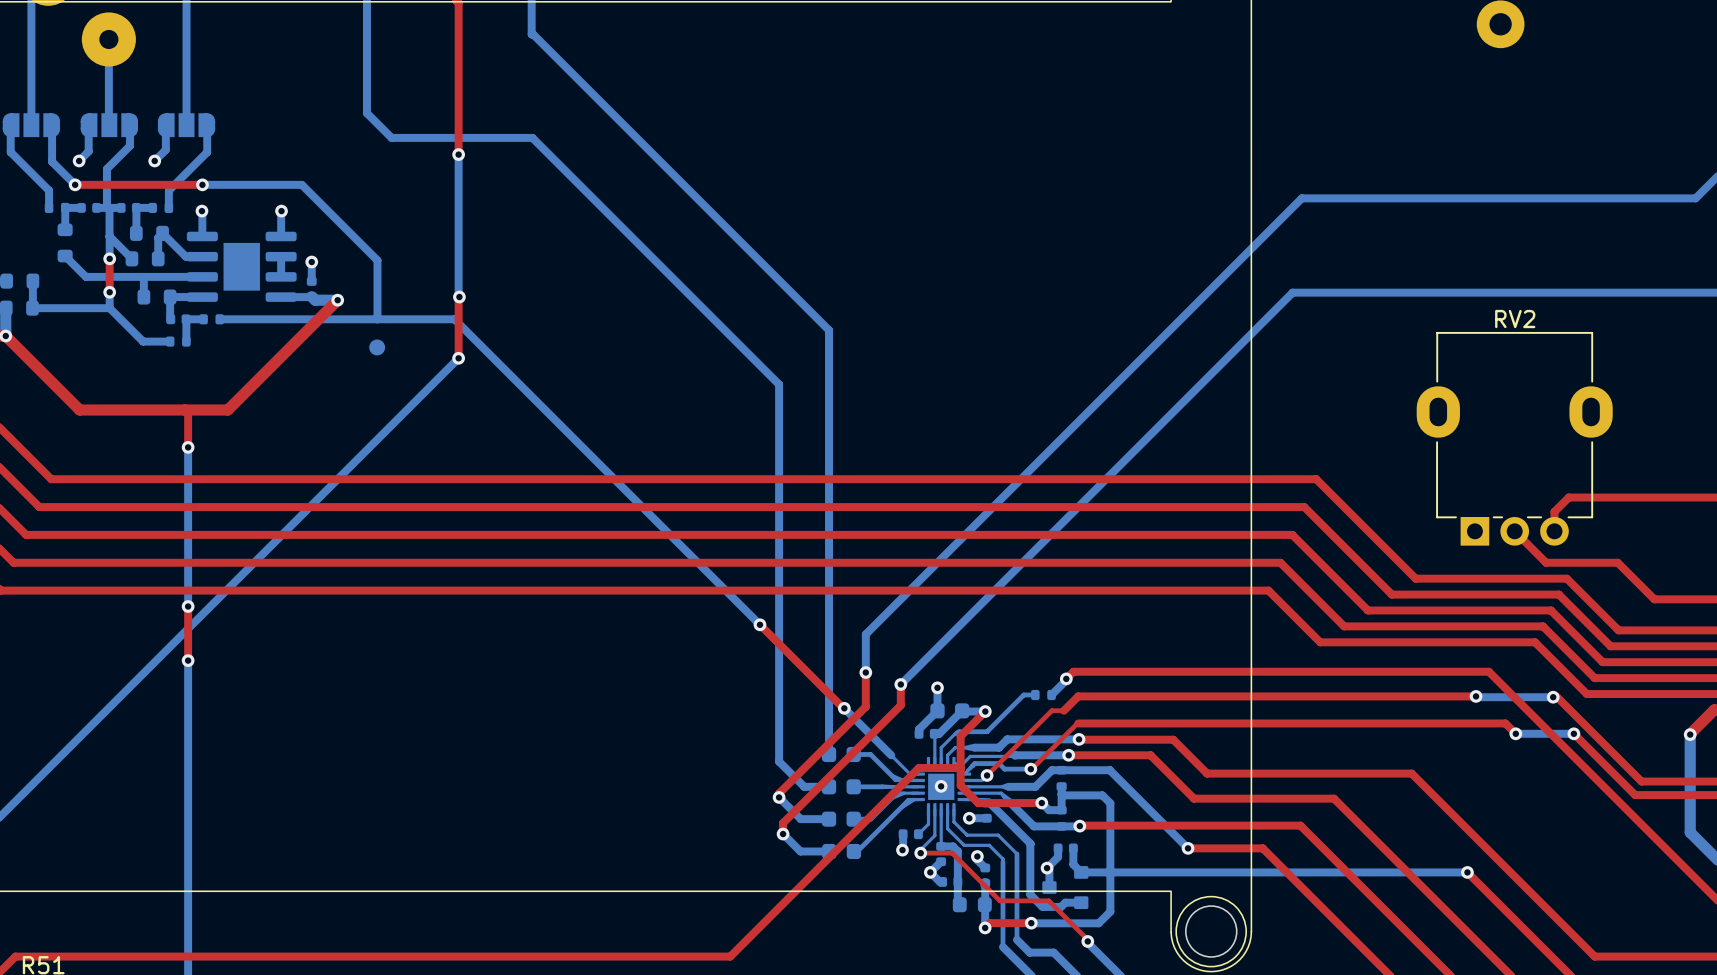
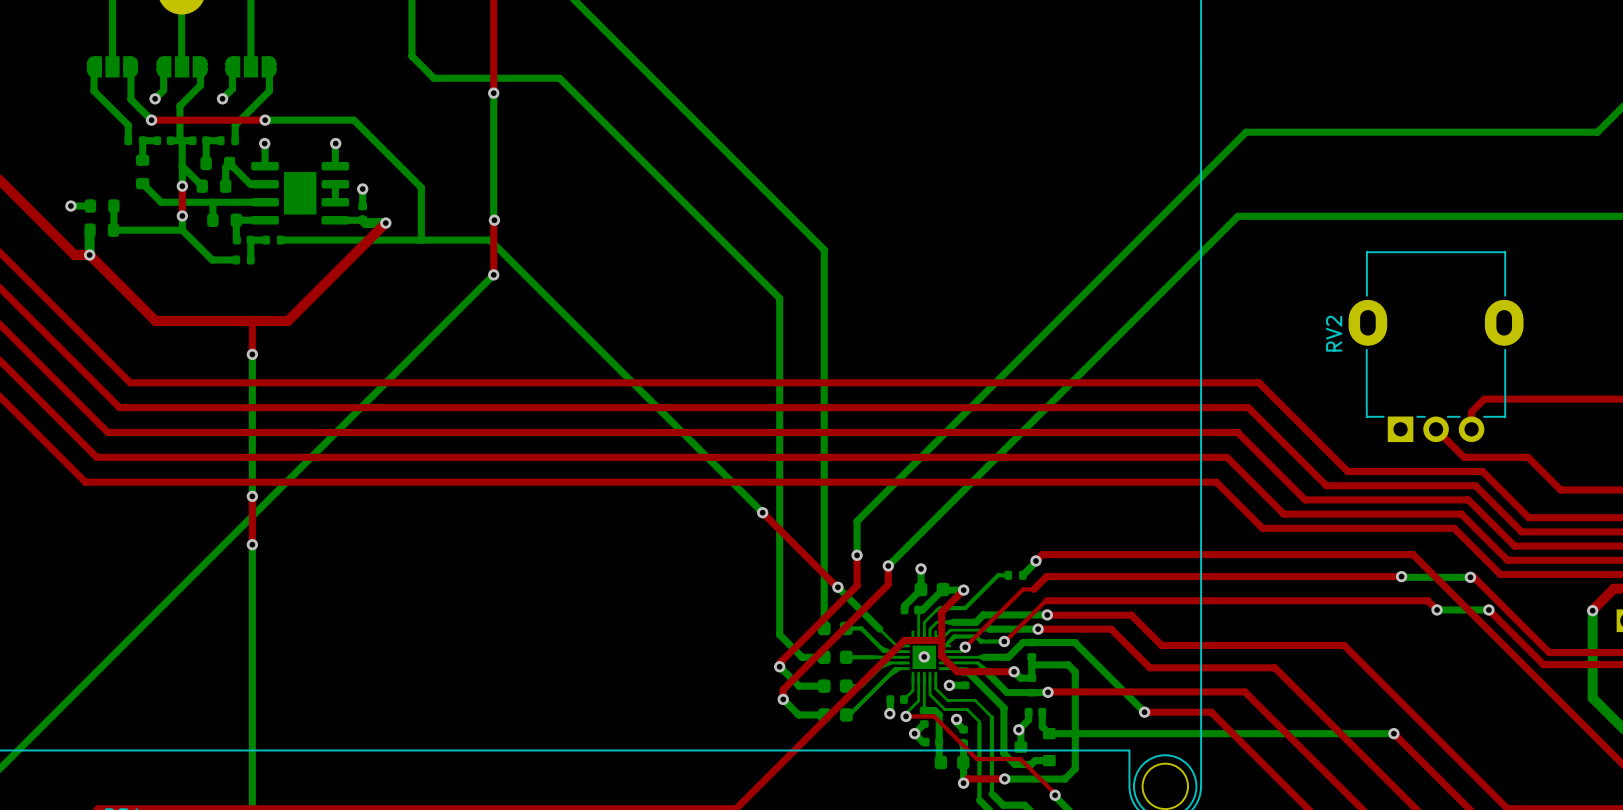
RV2 name rotation: 0° (1515, 319) -> 90° counterclockwise (1334, 333)
RV2 name position: RV2 (1515, 319) -> RV2 (1334, 333)
part: (377, 347) -> none

